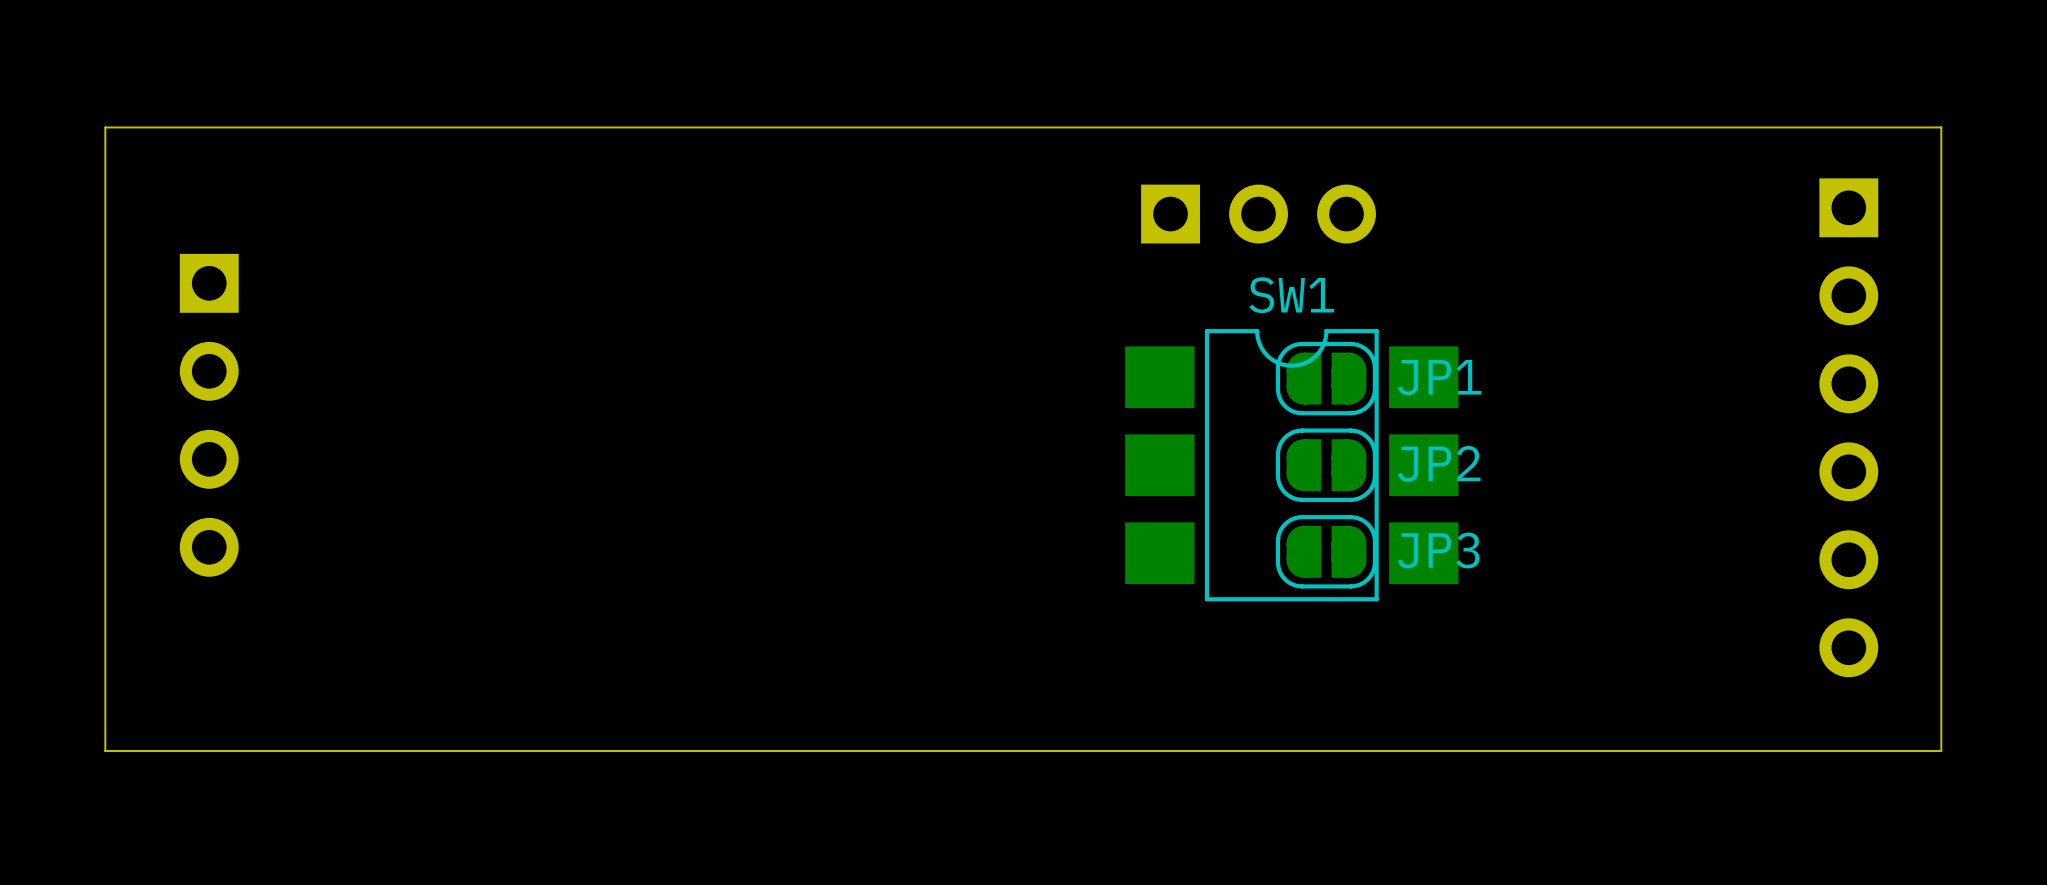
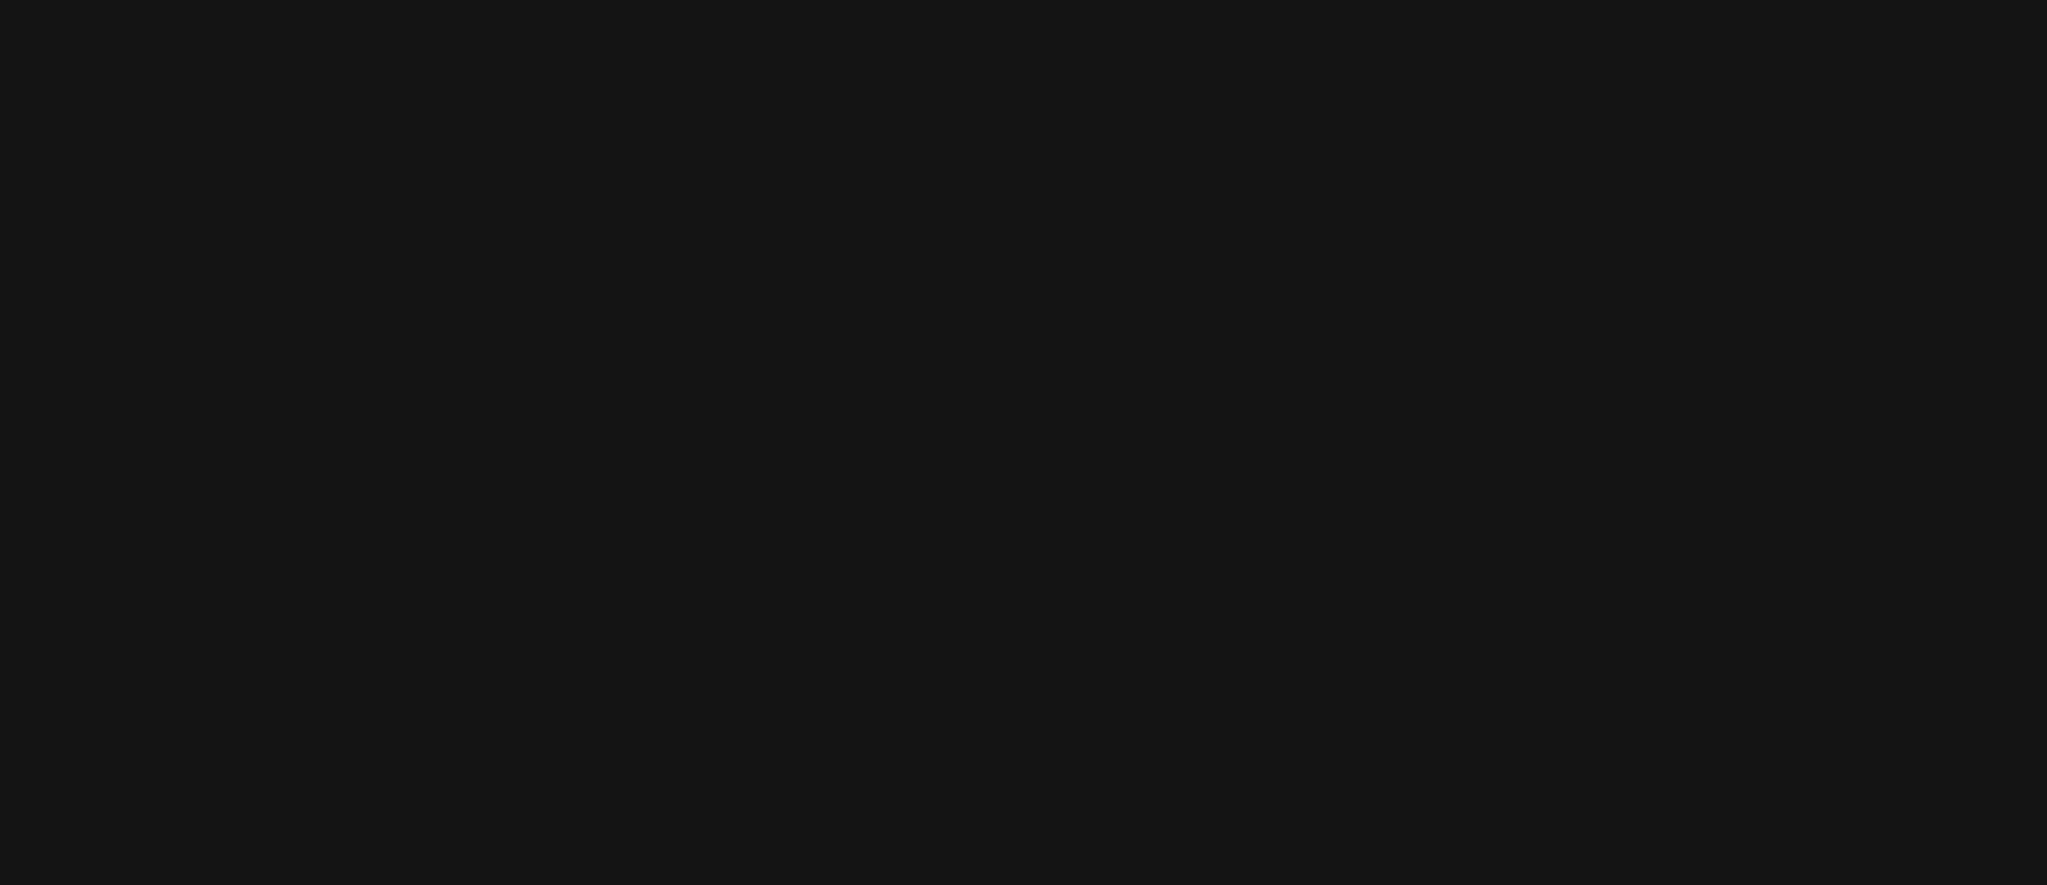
board edge: (1941, 127) (105, 127) (105, 750) (1941, 750) (1941, 127) -> none
part: (1258, 214) -> none
JP1: (1326, 378) -> none
part: (209, 415) -> none
part: (1848, 427) -> none
SW1: (1291, 465) -> none
JP2: (1326, 465) -> none
JP3: (1326, 551) -> none

